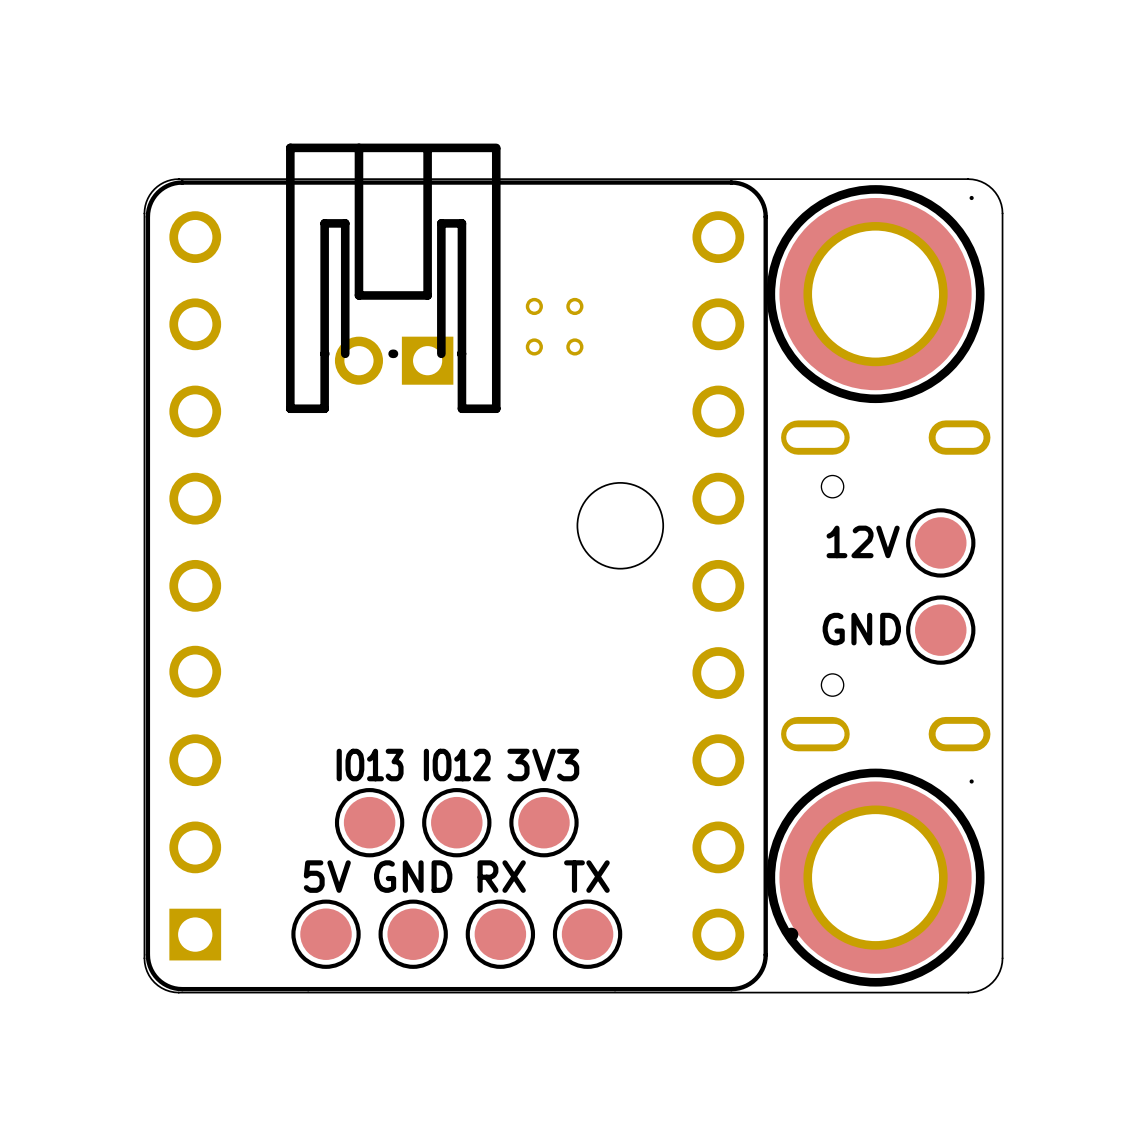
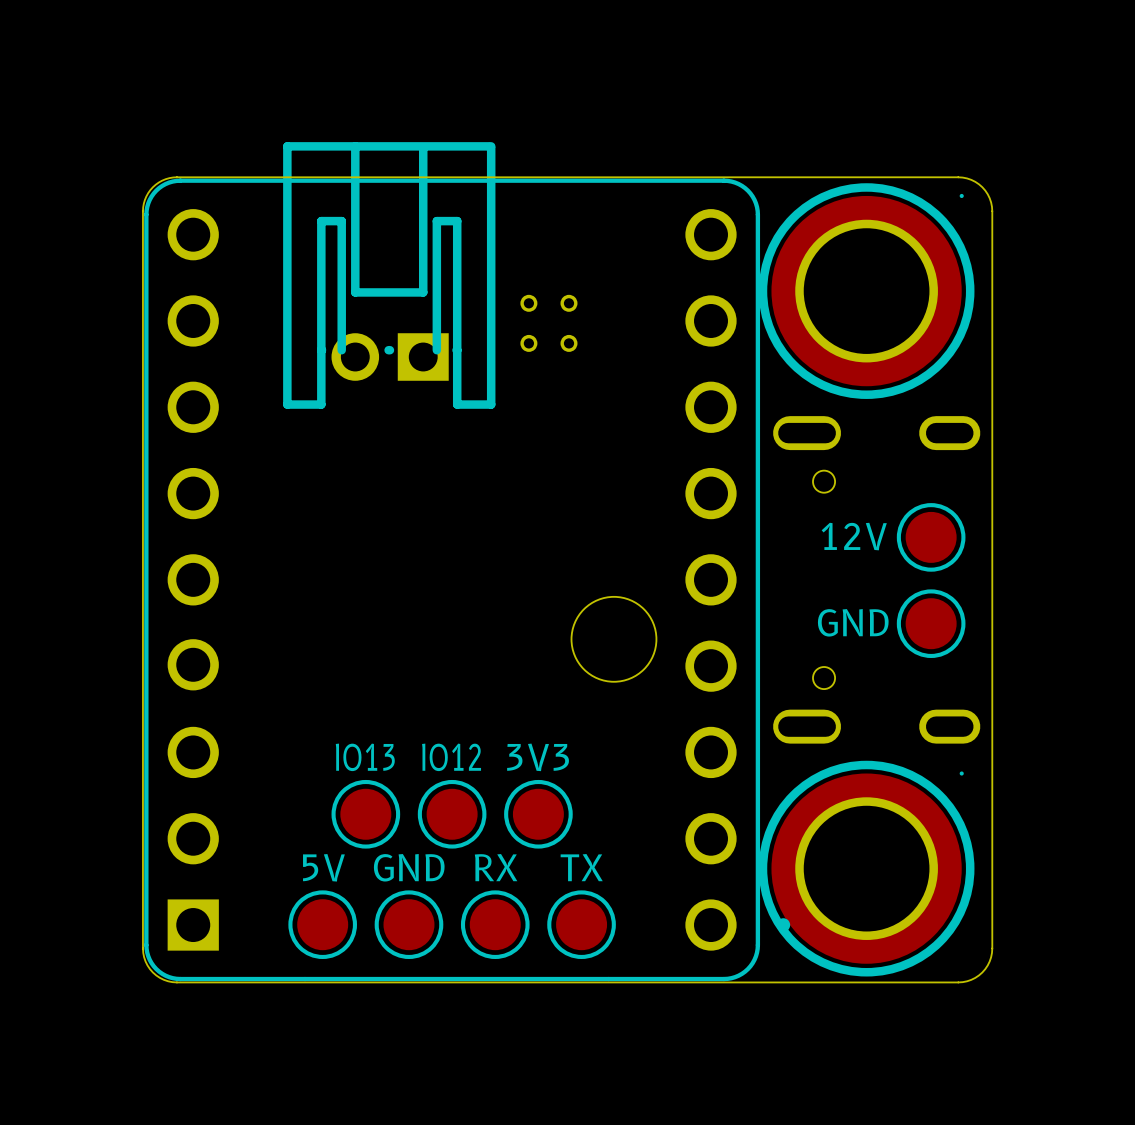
round board edge position: (620, 525) -> (613, 639)

